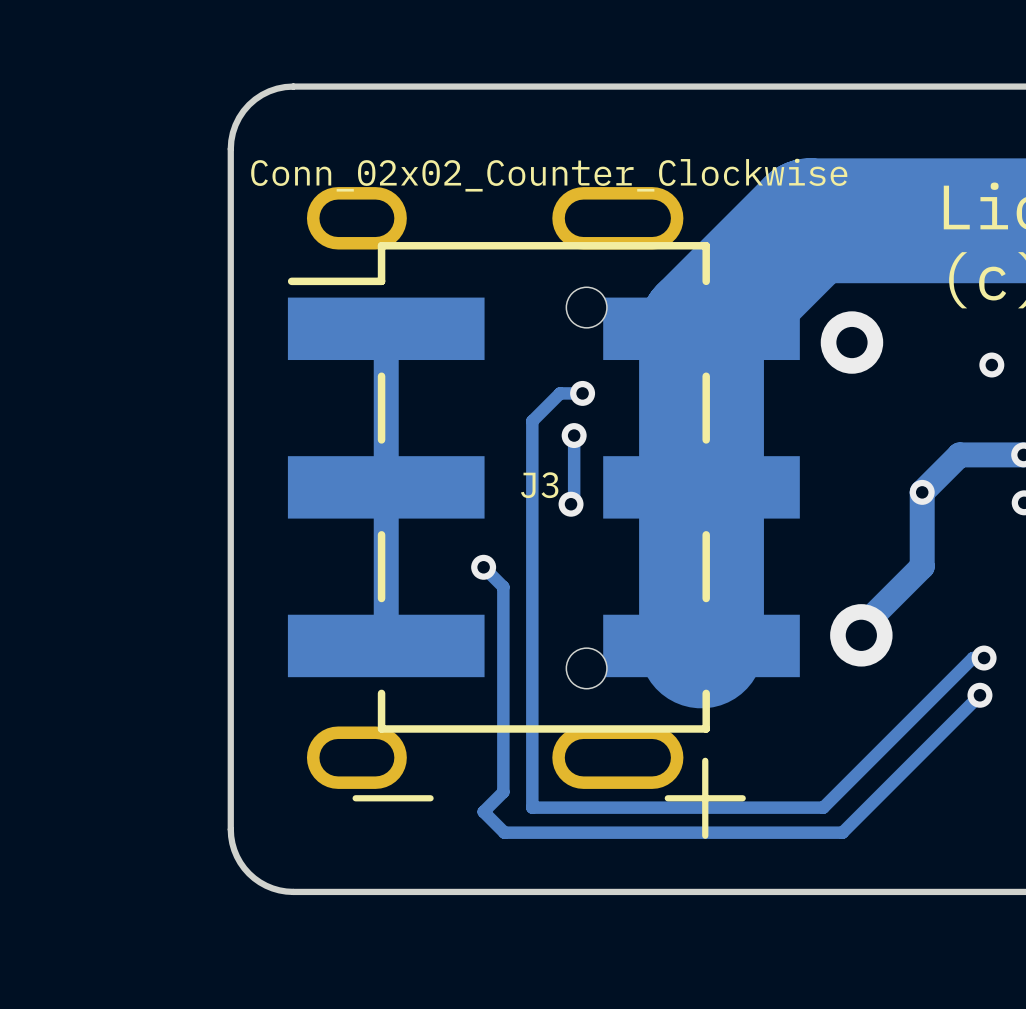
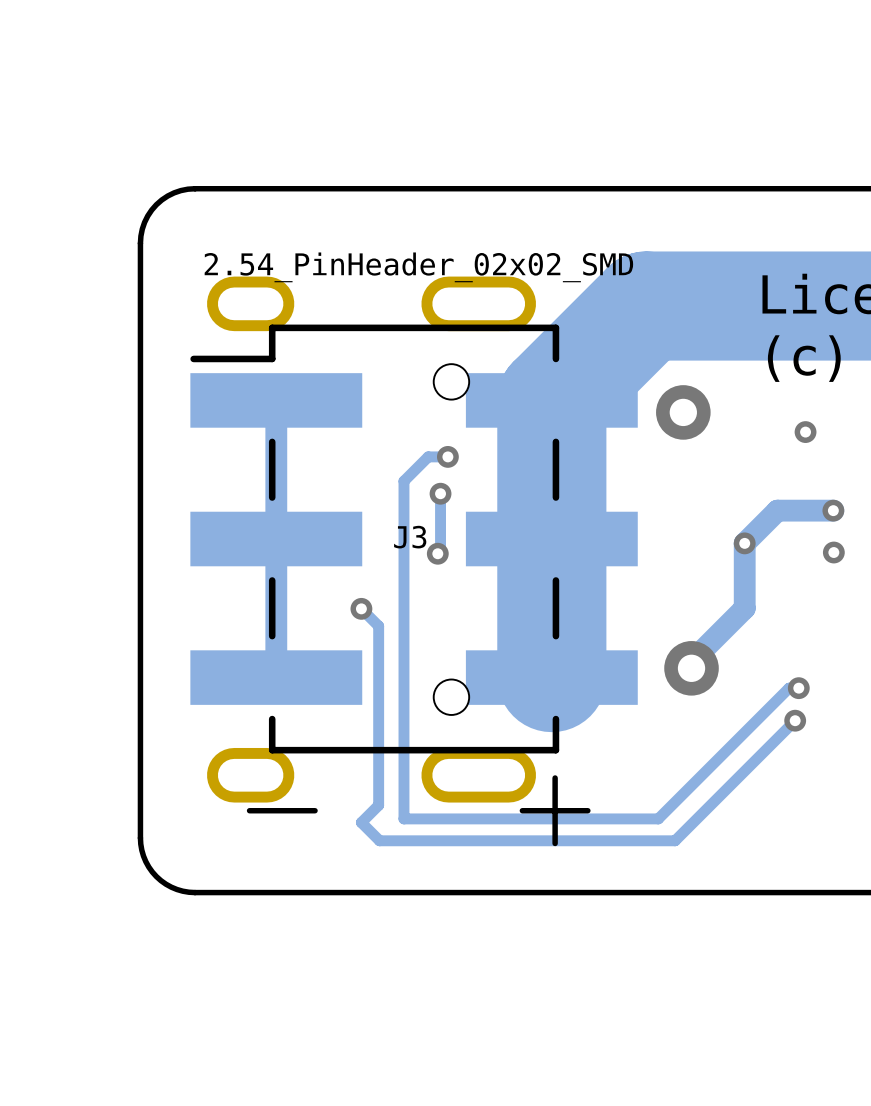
J3 value: Conn_02x02_Counter_Clockwise (549, 175) -> 2.54_PinHeader_02x02_SMD (418, 267)

